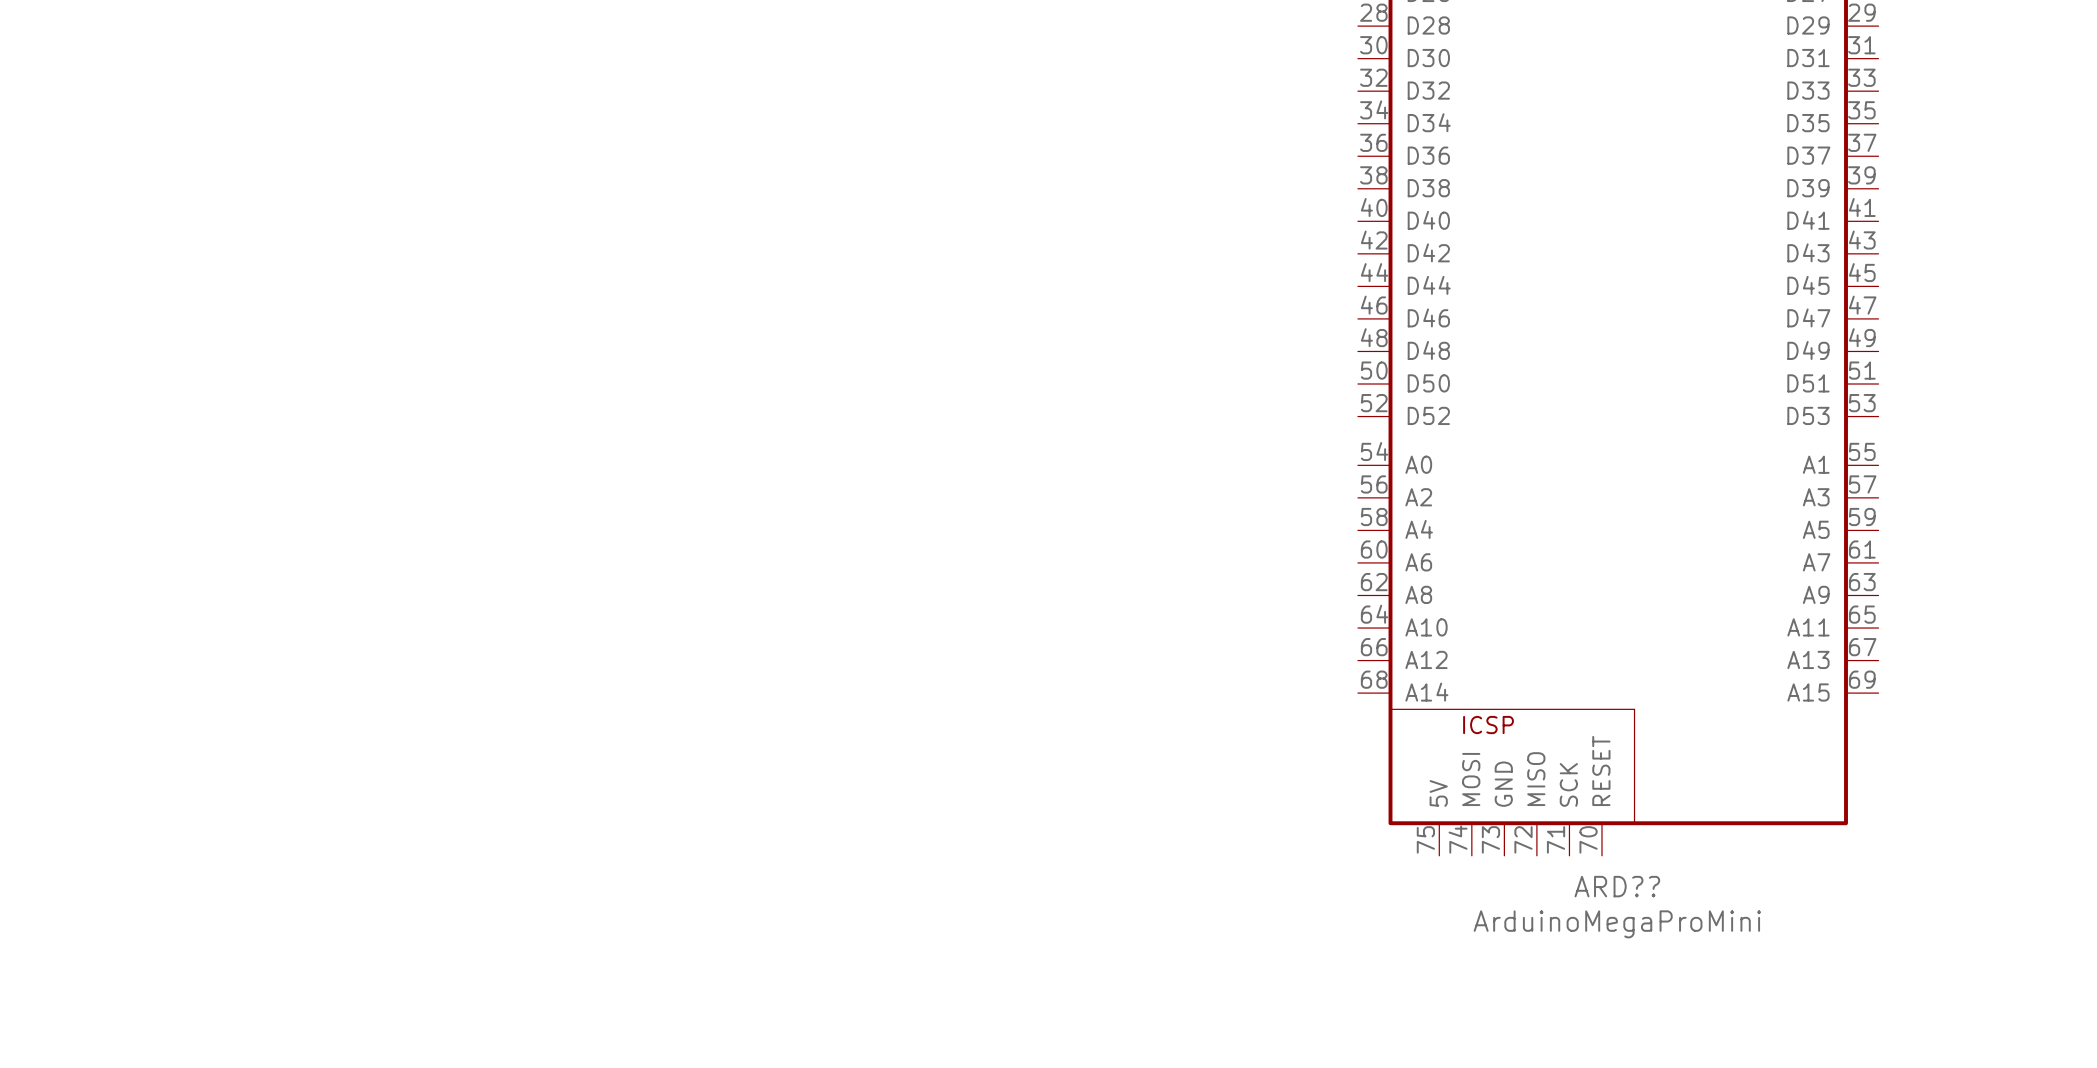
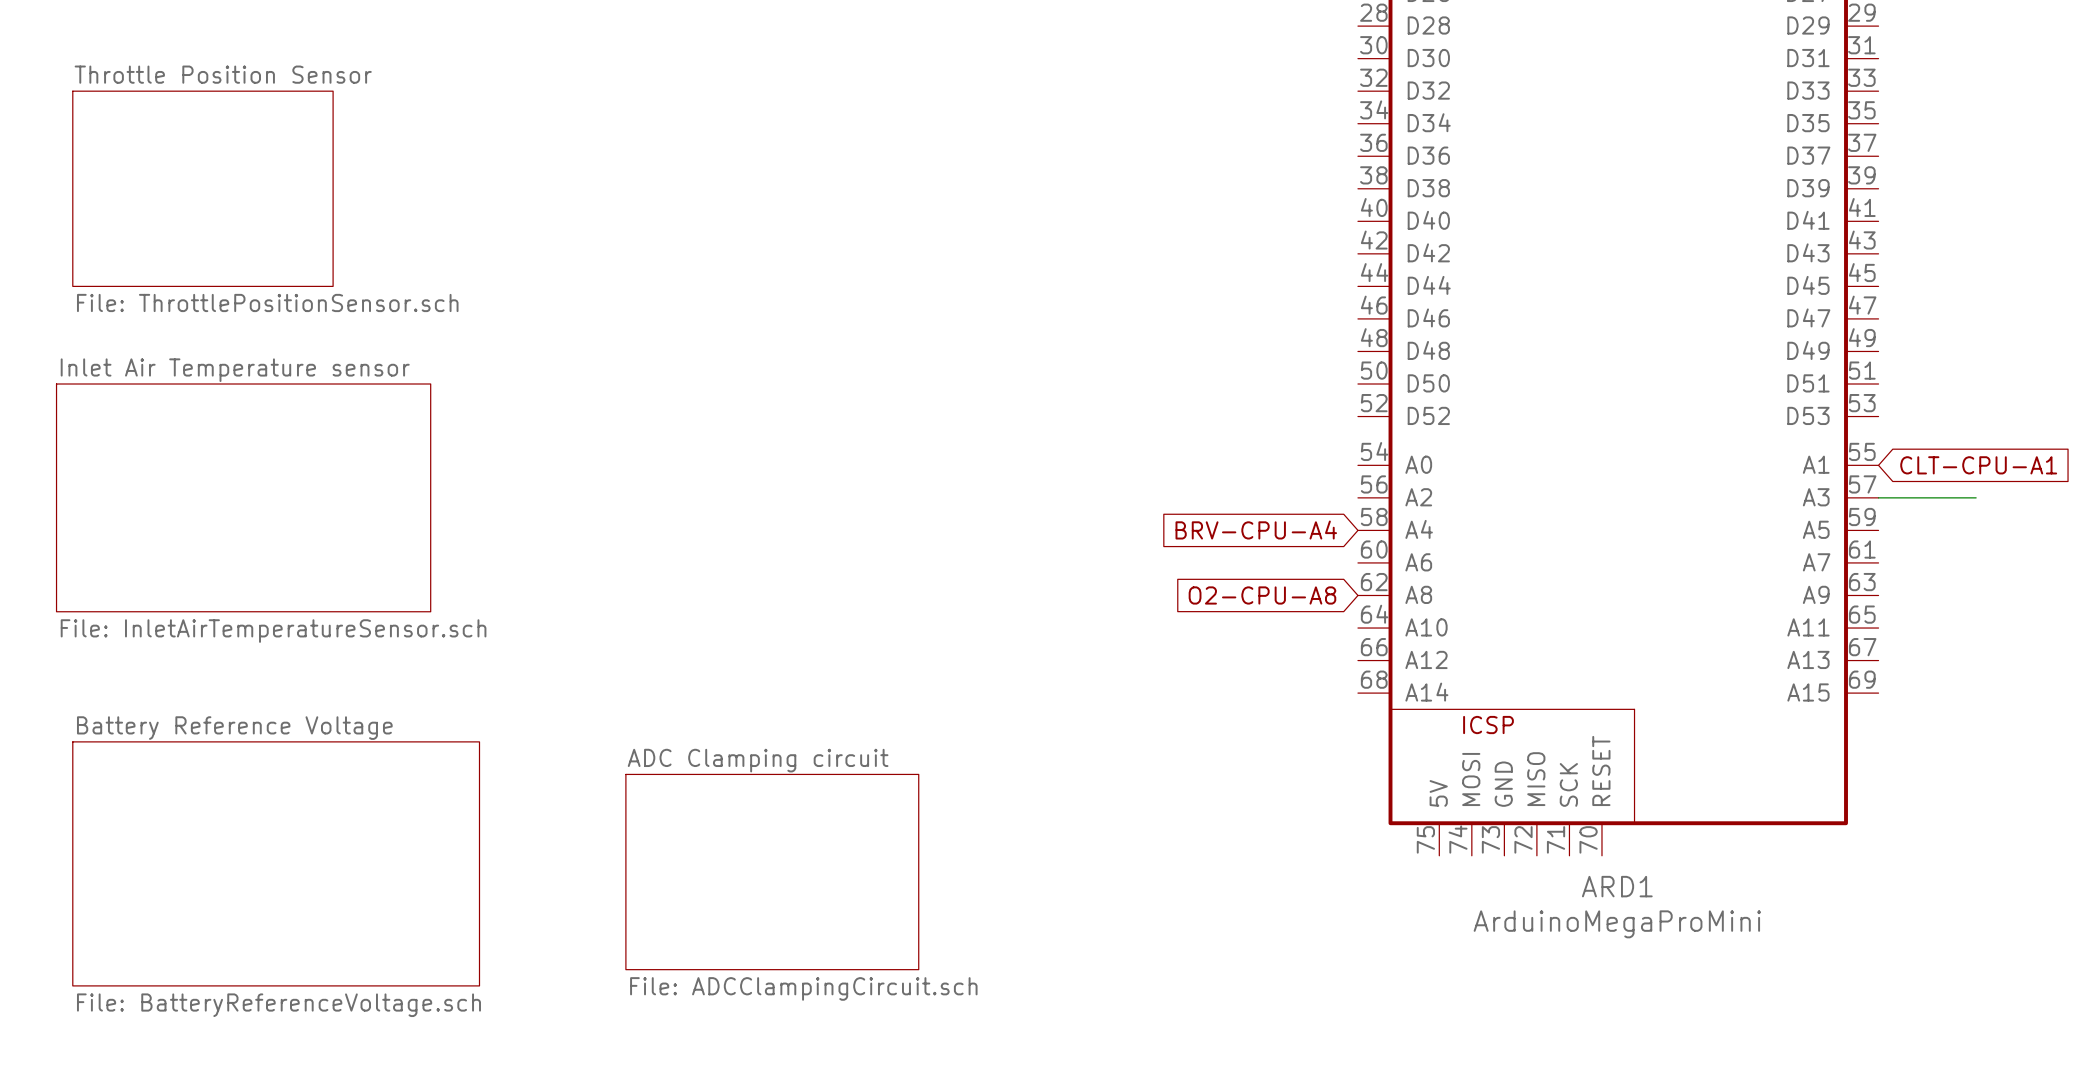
sheet Throttle Position Sensor: none -> File: ThrottlePositionSensor.sch (202, 188)
global label: none -> CLT-CPU-A1 (1978, 465)
sheet Inlet Air Temperature sensor: none -> File: InletAirTemperatureSensor.sch (243, 497)
wire: none -> (1878, 497) (1976, 497)
global label: none -> BRV-CPU-A4 (1256, 530)
global label: none -> O2-CPU-A8 (1262, 595)
sheet Battery Reference Voltage: none -> File: BatteryReferenceVoltage.sch (276, 863)
sheet ADC Clamping circuit: none -> File: ADCClampingCircuit.sch (772, 872)
ARD?? name: ARD?? (1617, 886) -> ARD1 (1617, 886)

